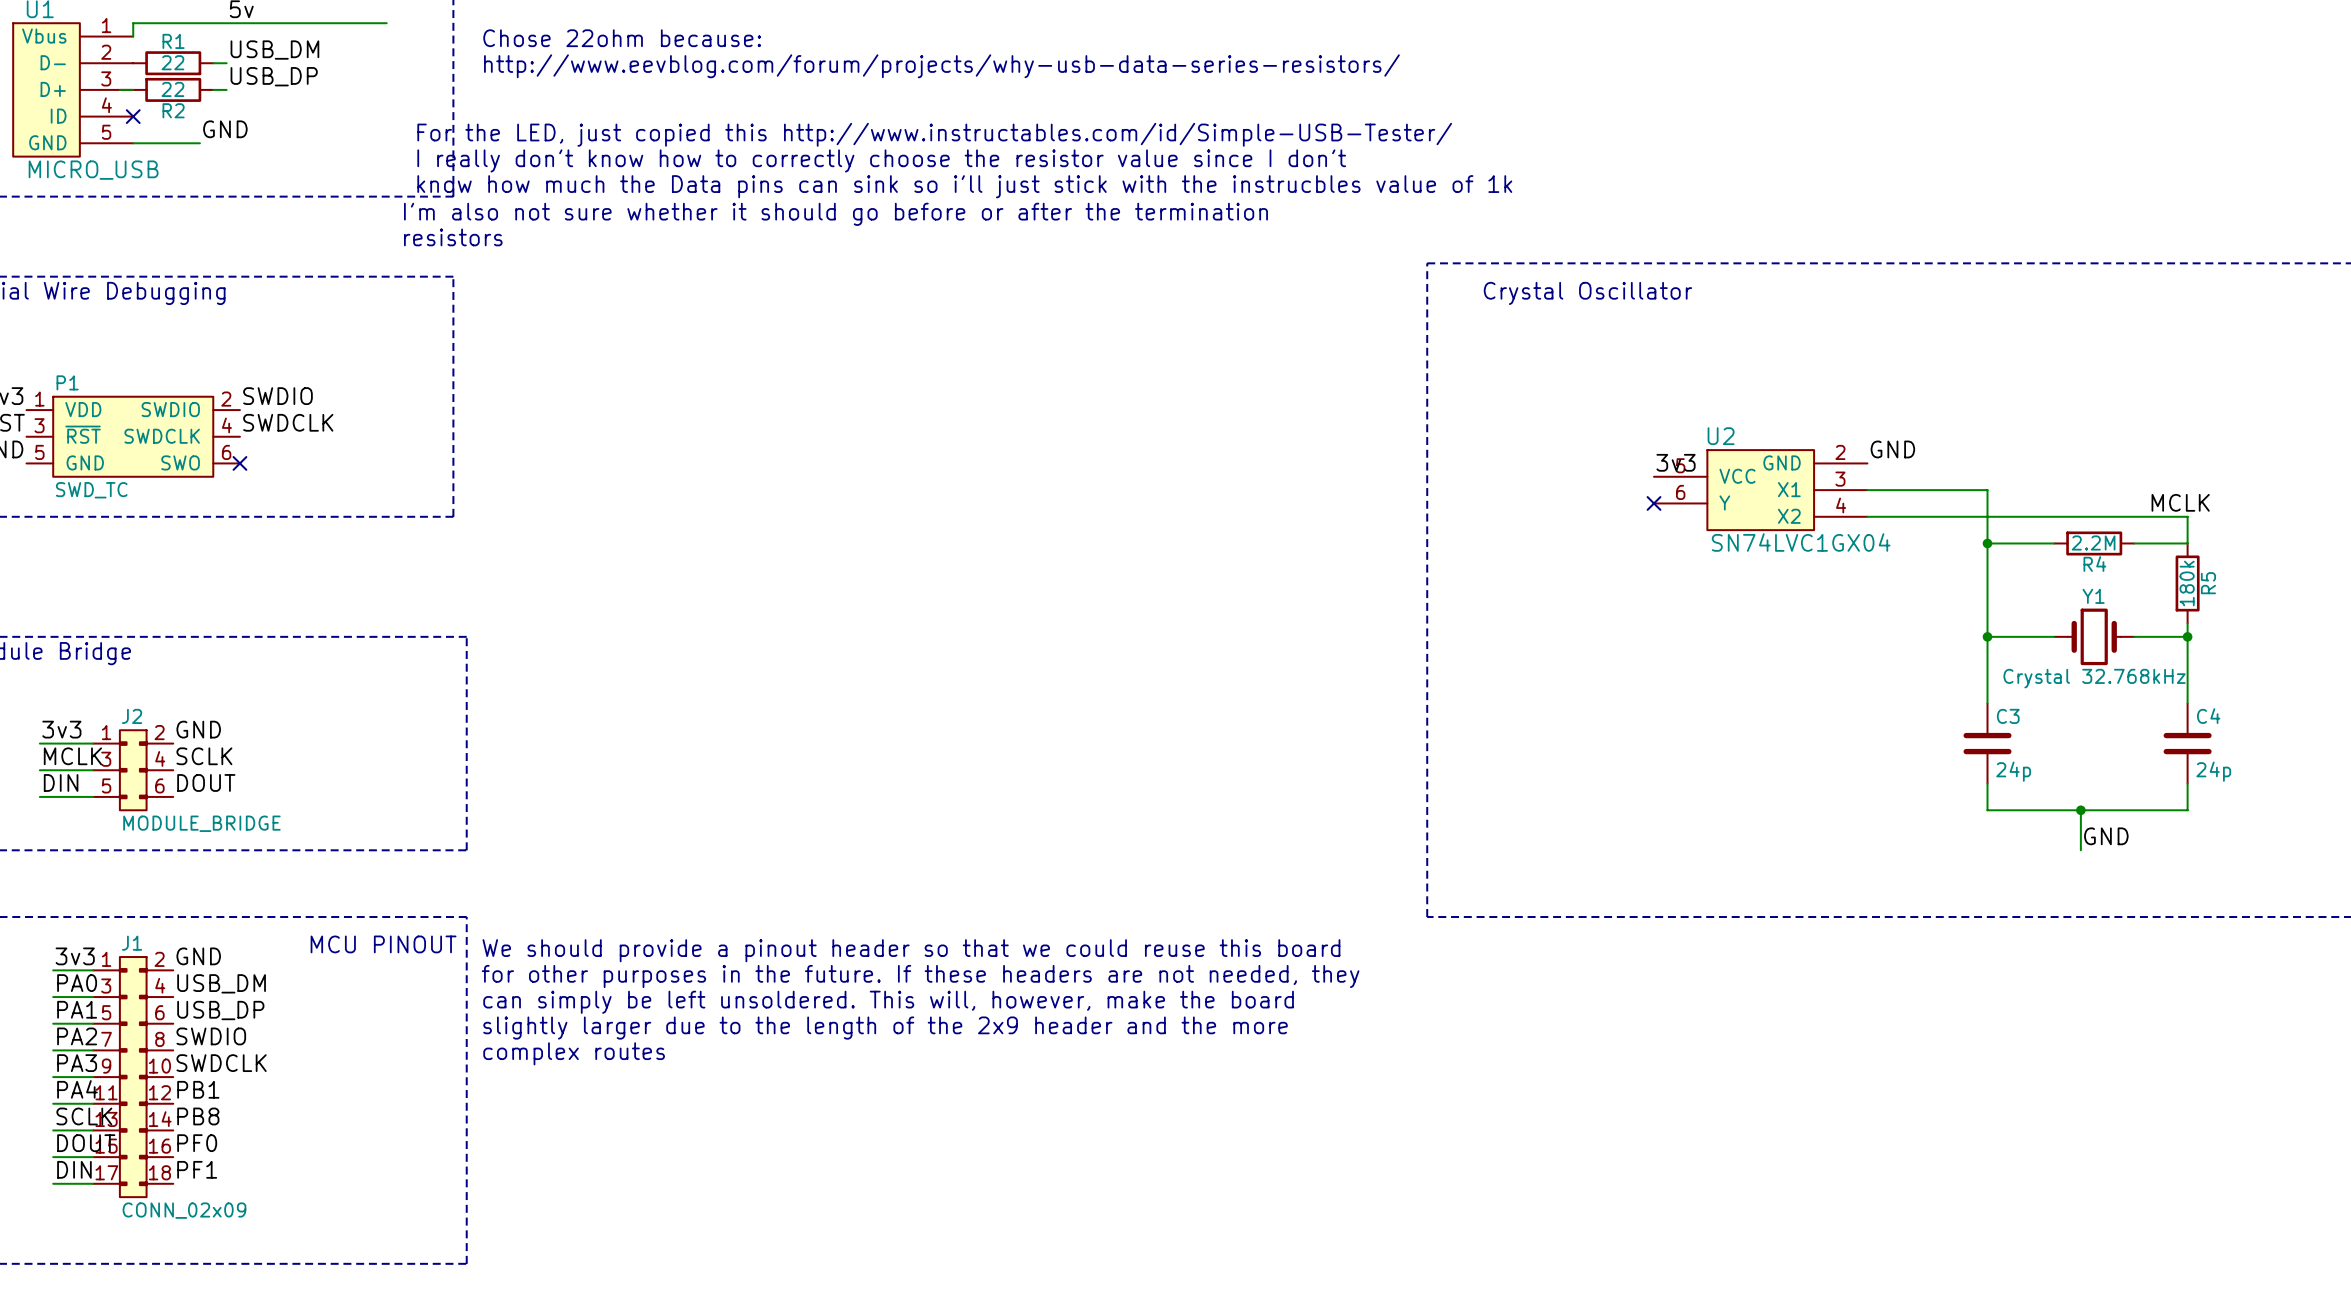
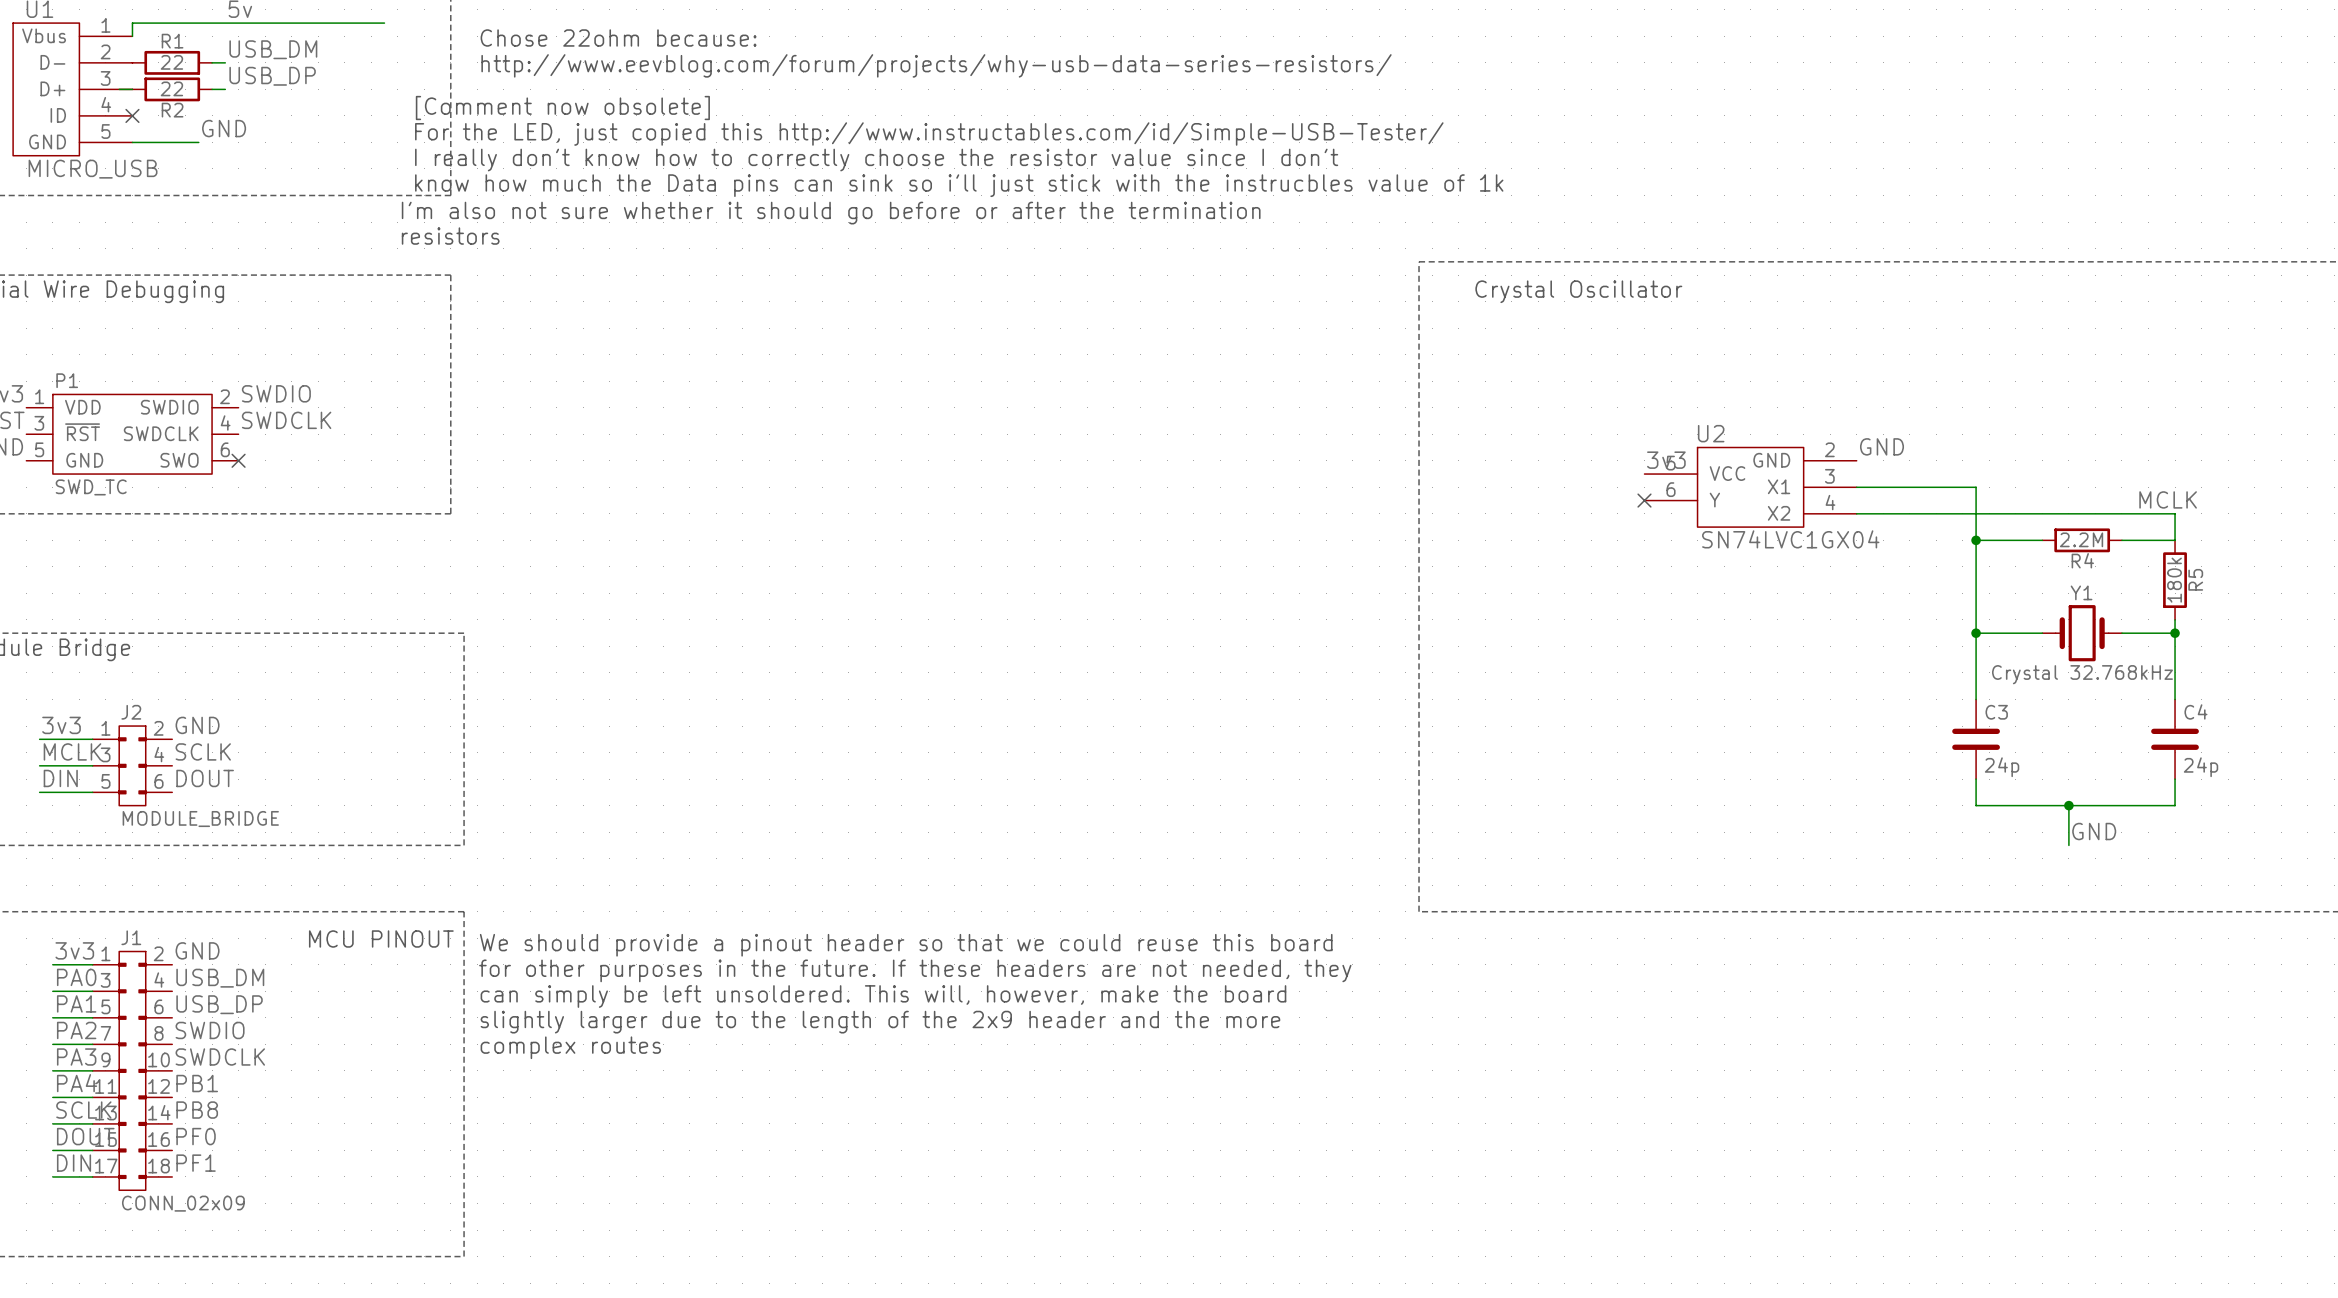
text: none -> [Comment now obsolete] (562, 108)

